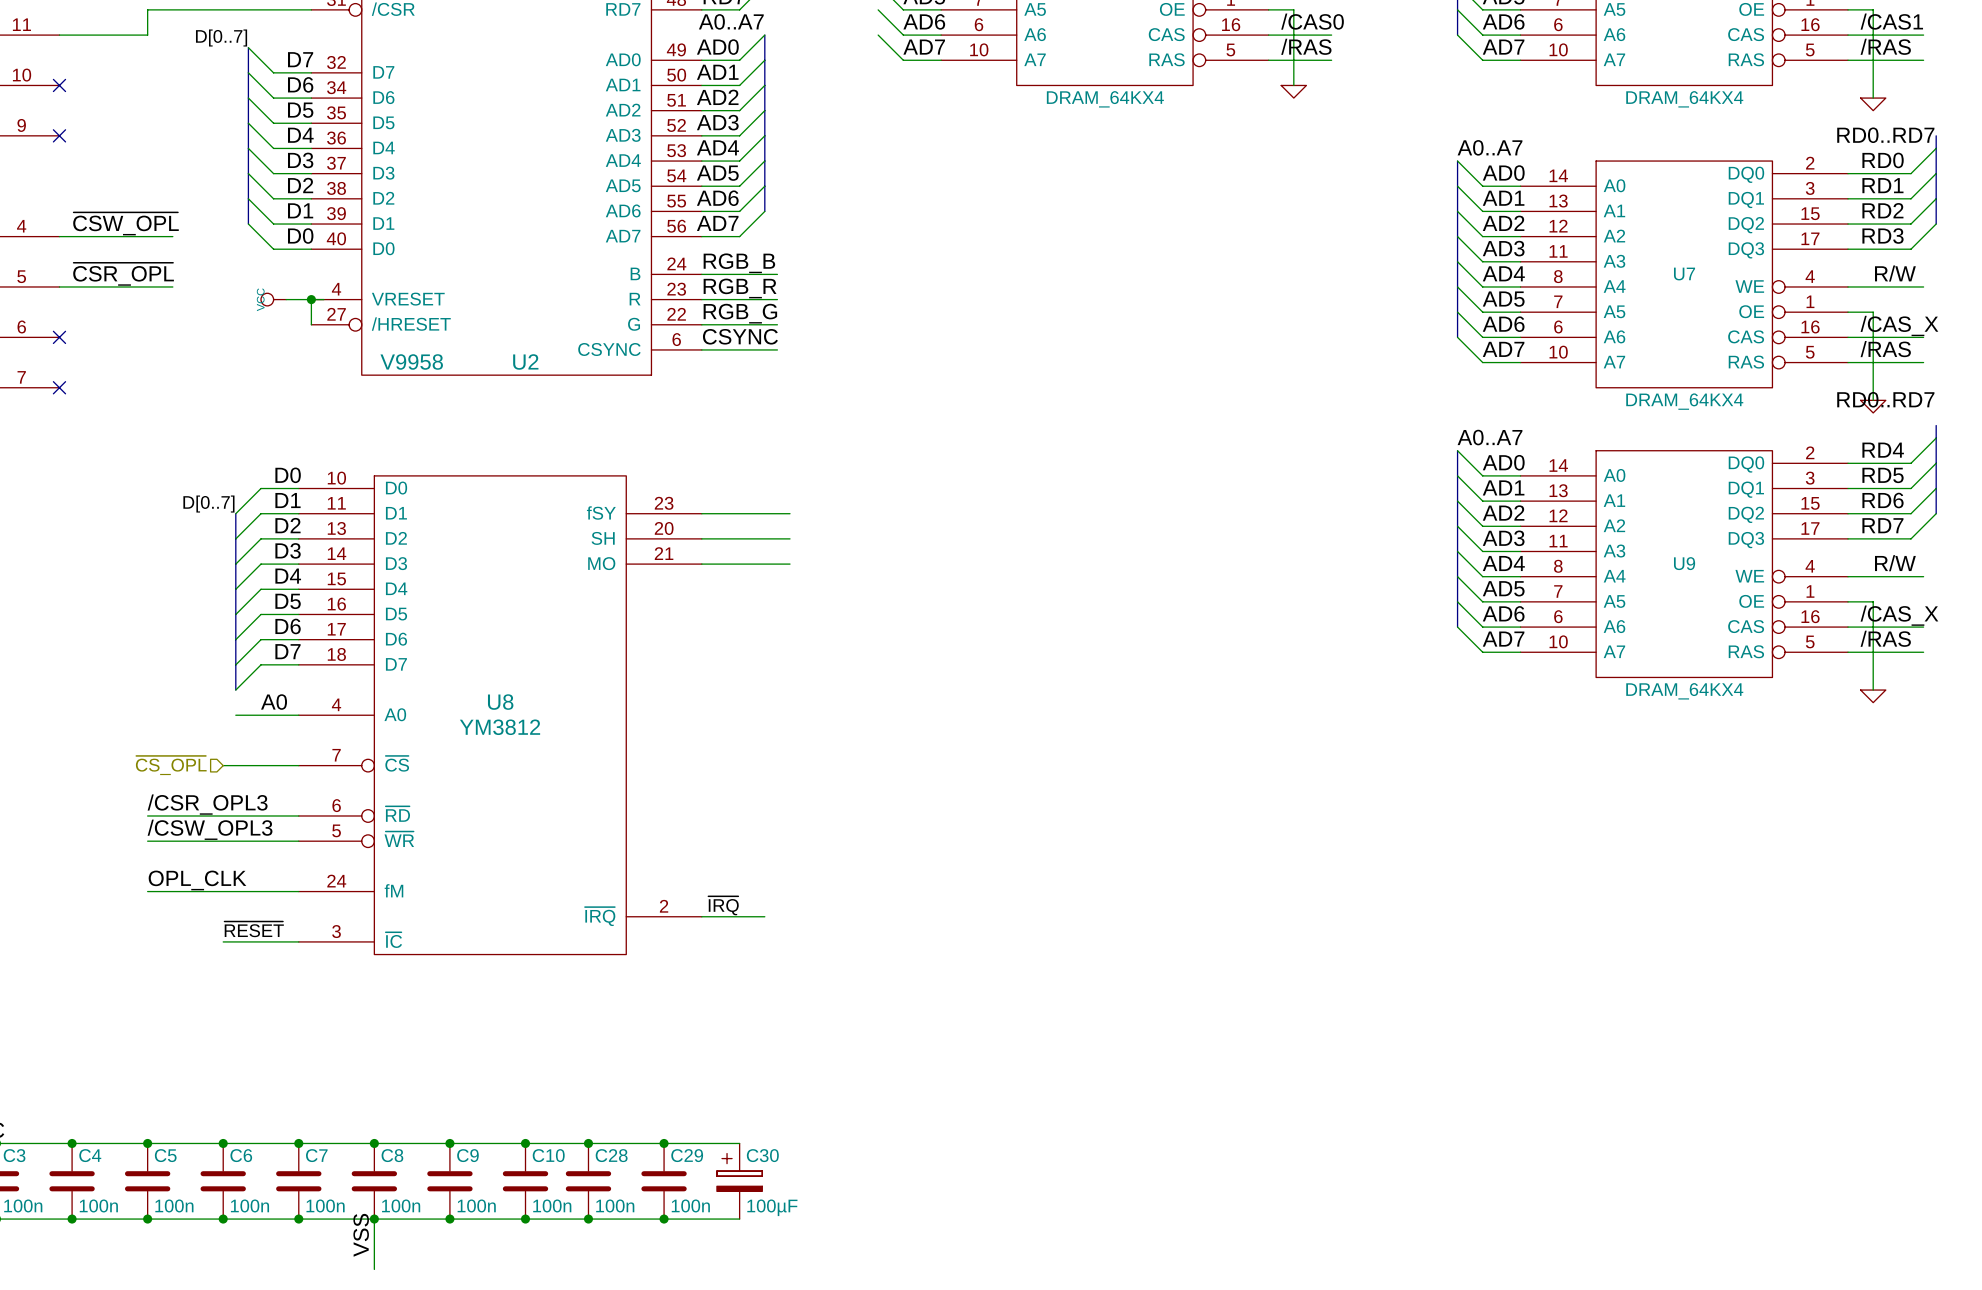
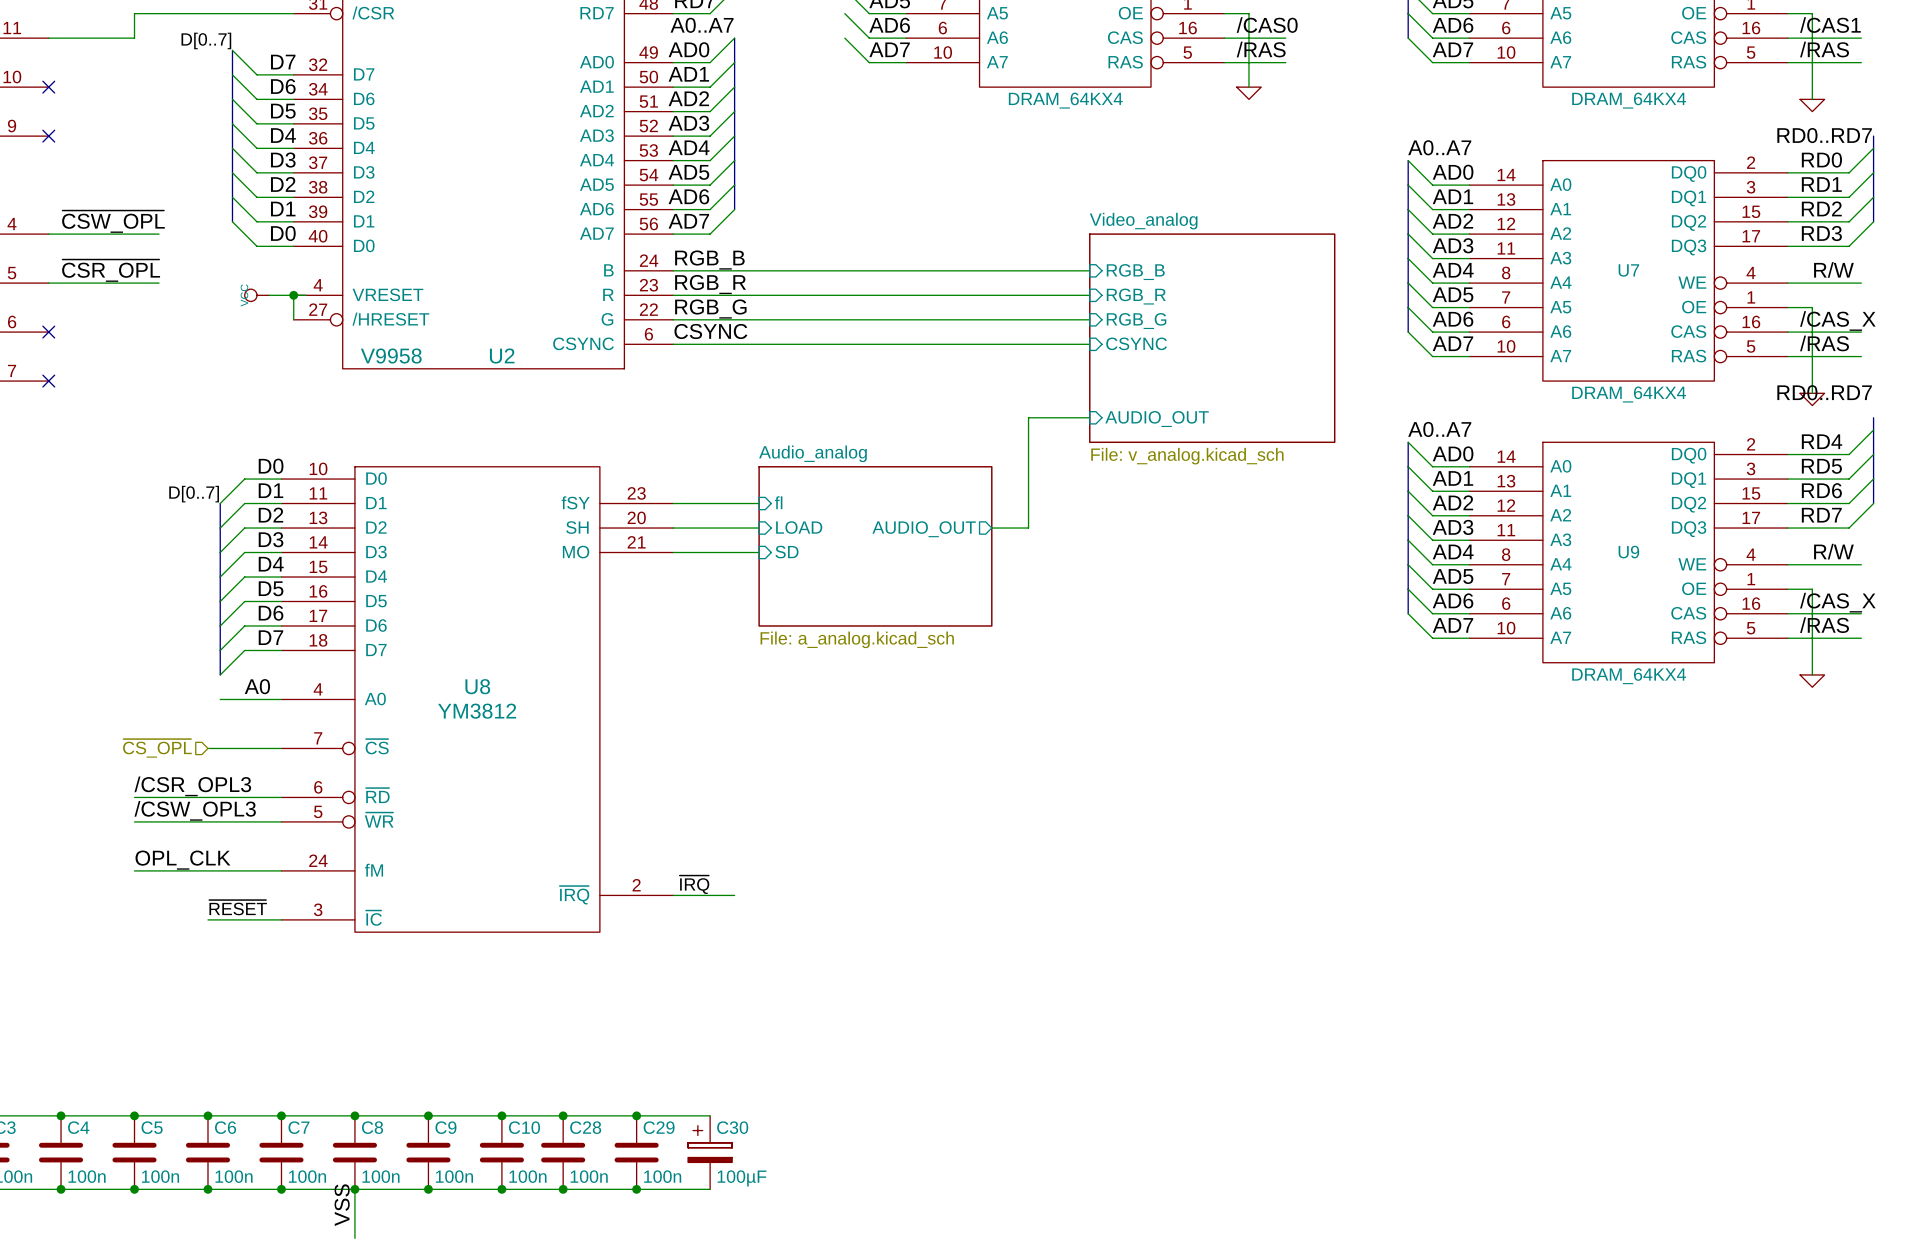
wire: none -> (746, 270) (1089, 270)
sheet pin: none -> RGB_B (1135, 272)
wire: none -> (746, 295) (1089, 295)
sheet pin: none -> RGB_R (1136, 296)
wire: none -> (746, 319) (1089, 319)
sheet pin: none -> RGB_G (1136, 321)
sheet Video_analog: none -> File: v_analog.kicad_sch (1212, 338)
wire: none -> (746, 344) (1089, 344)
sheet pin: none -> CSYNC (1136, 343)
wire: none -> (1089, 417) (1028, 417) (1028, 528) (991, 528)
sheet pin: none -> AUDIO_OUT (1157, 419)
sheet pin: none -> fl (778, 502)
sheet pin: none -> LOAD (799, 527)
sheet pin: none -> AUDIO_OUT (924, 529)
sheet Audio_analog: none -> File: a_analog.kicad_sch (875, 546)
sheet pin: none -> SD (787, 552)

